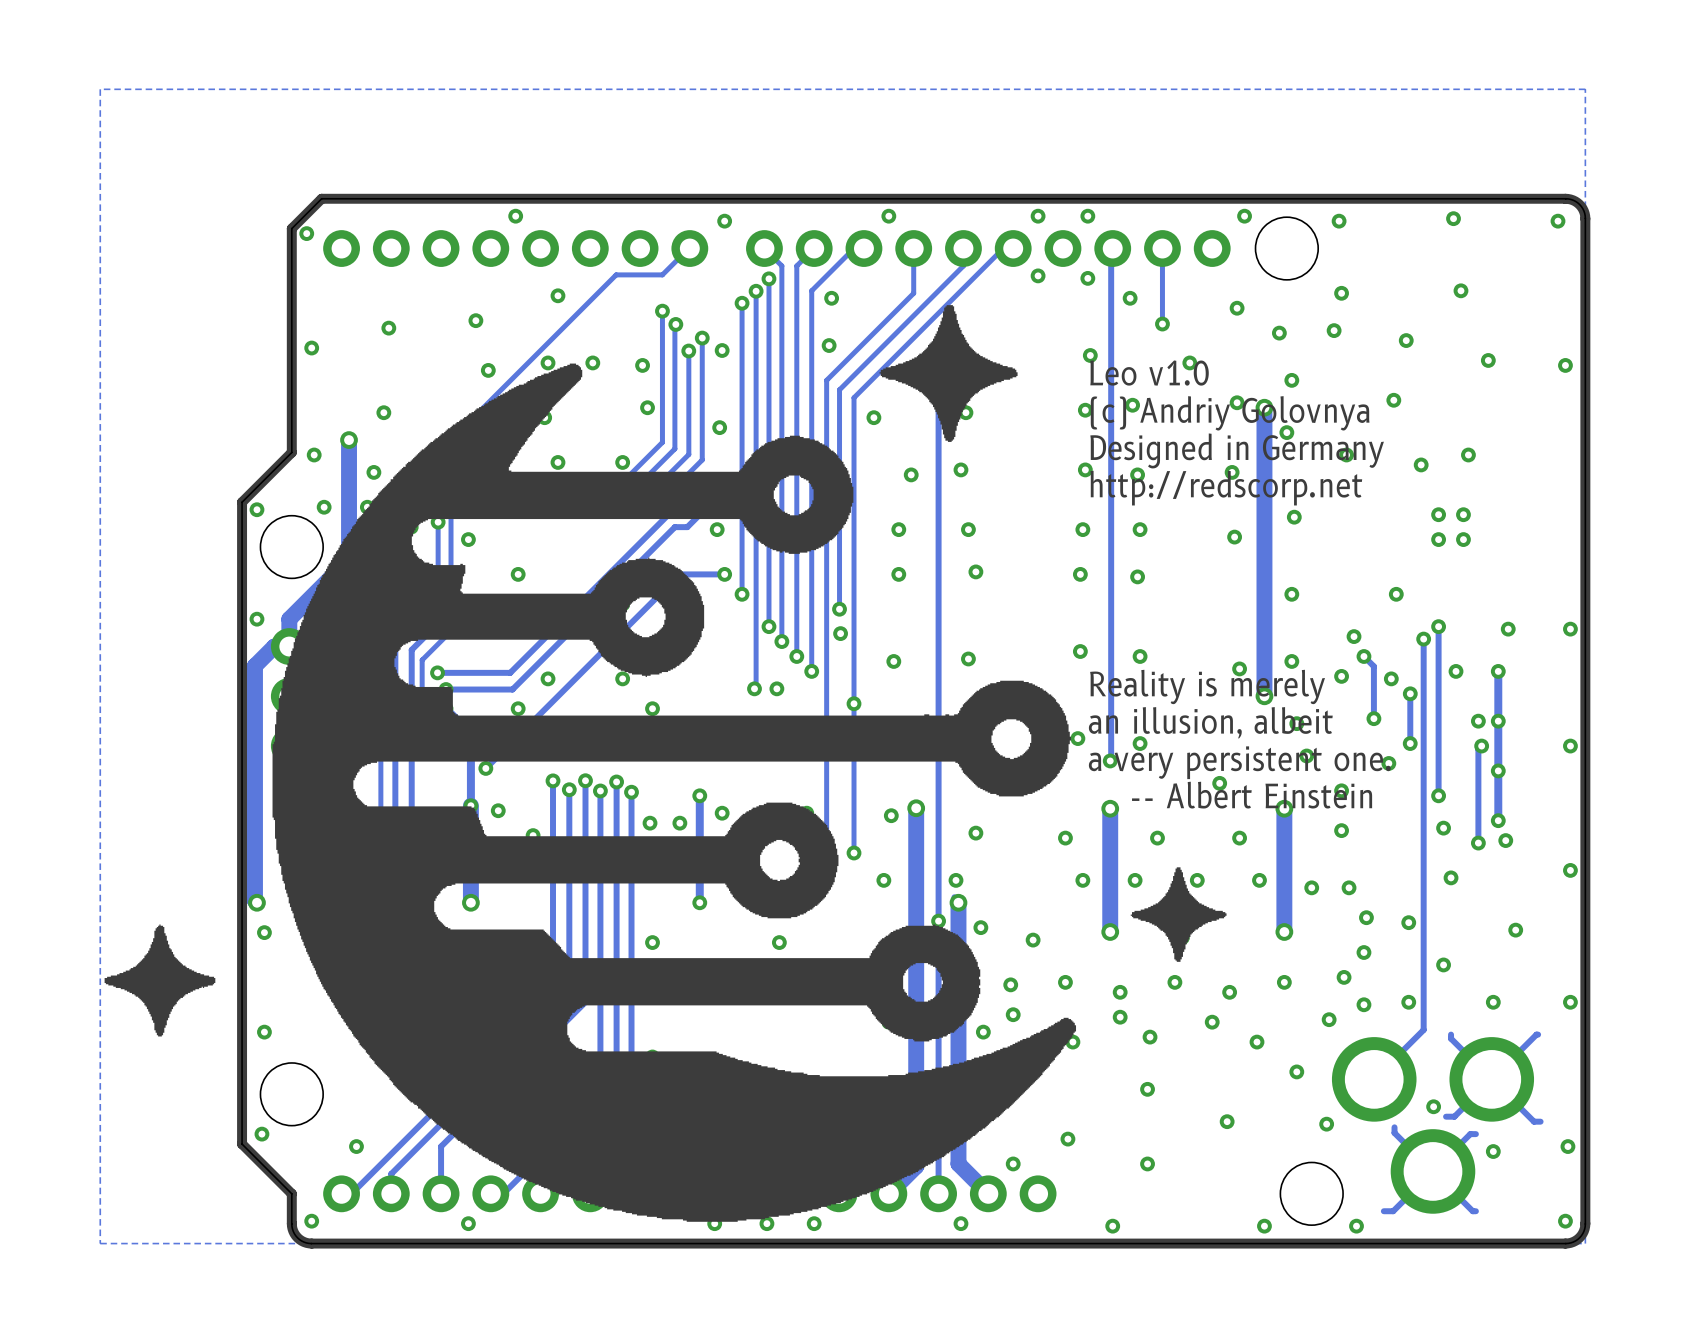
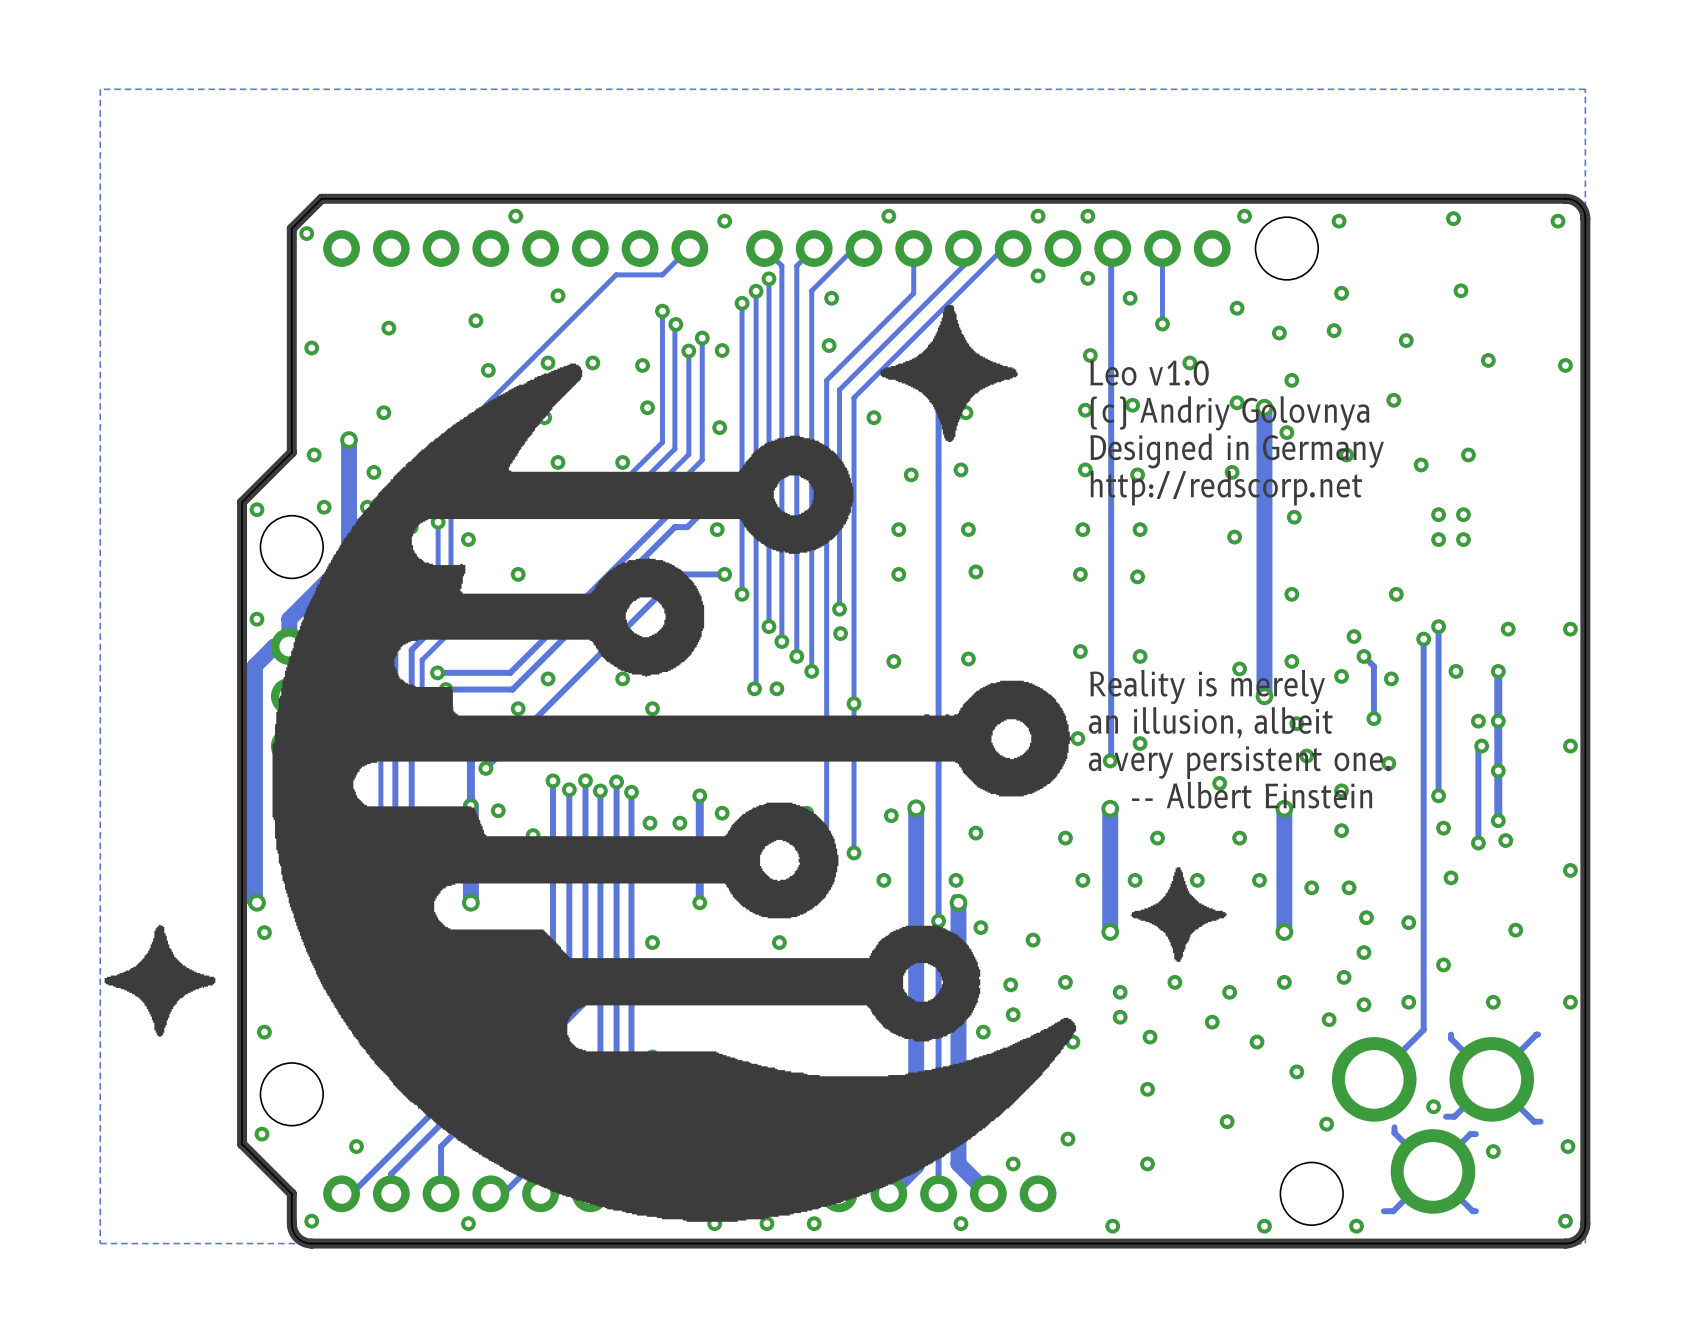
track: (1410, 693) (1410, 743) -> none
via: (1410, 693) -> none
via: (1410, 743) -> none

